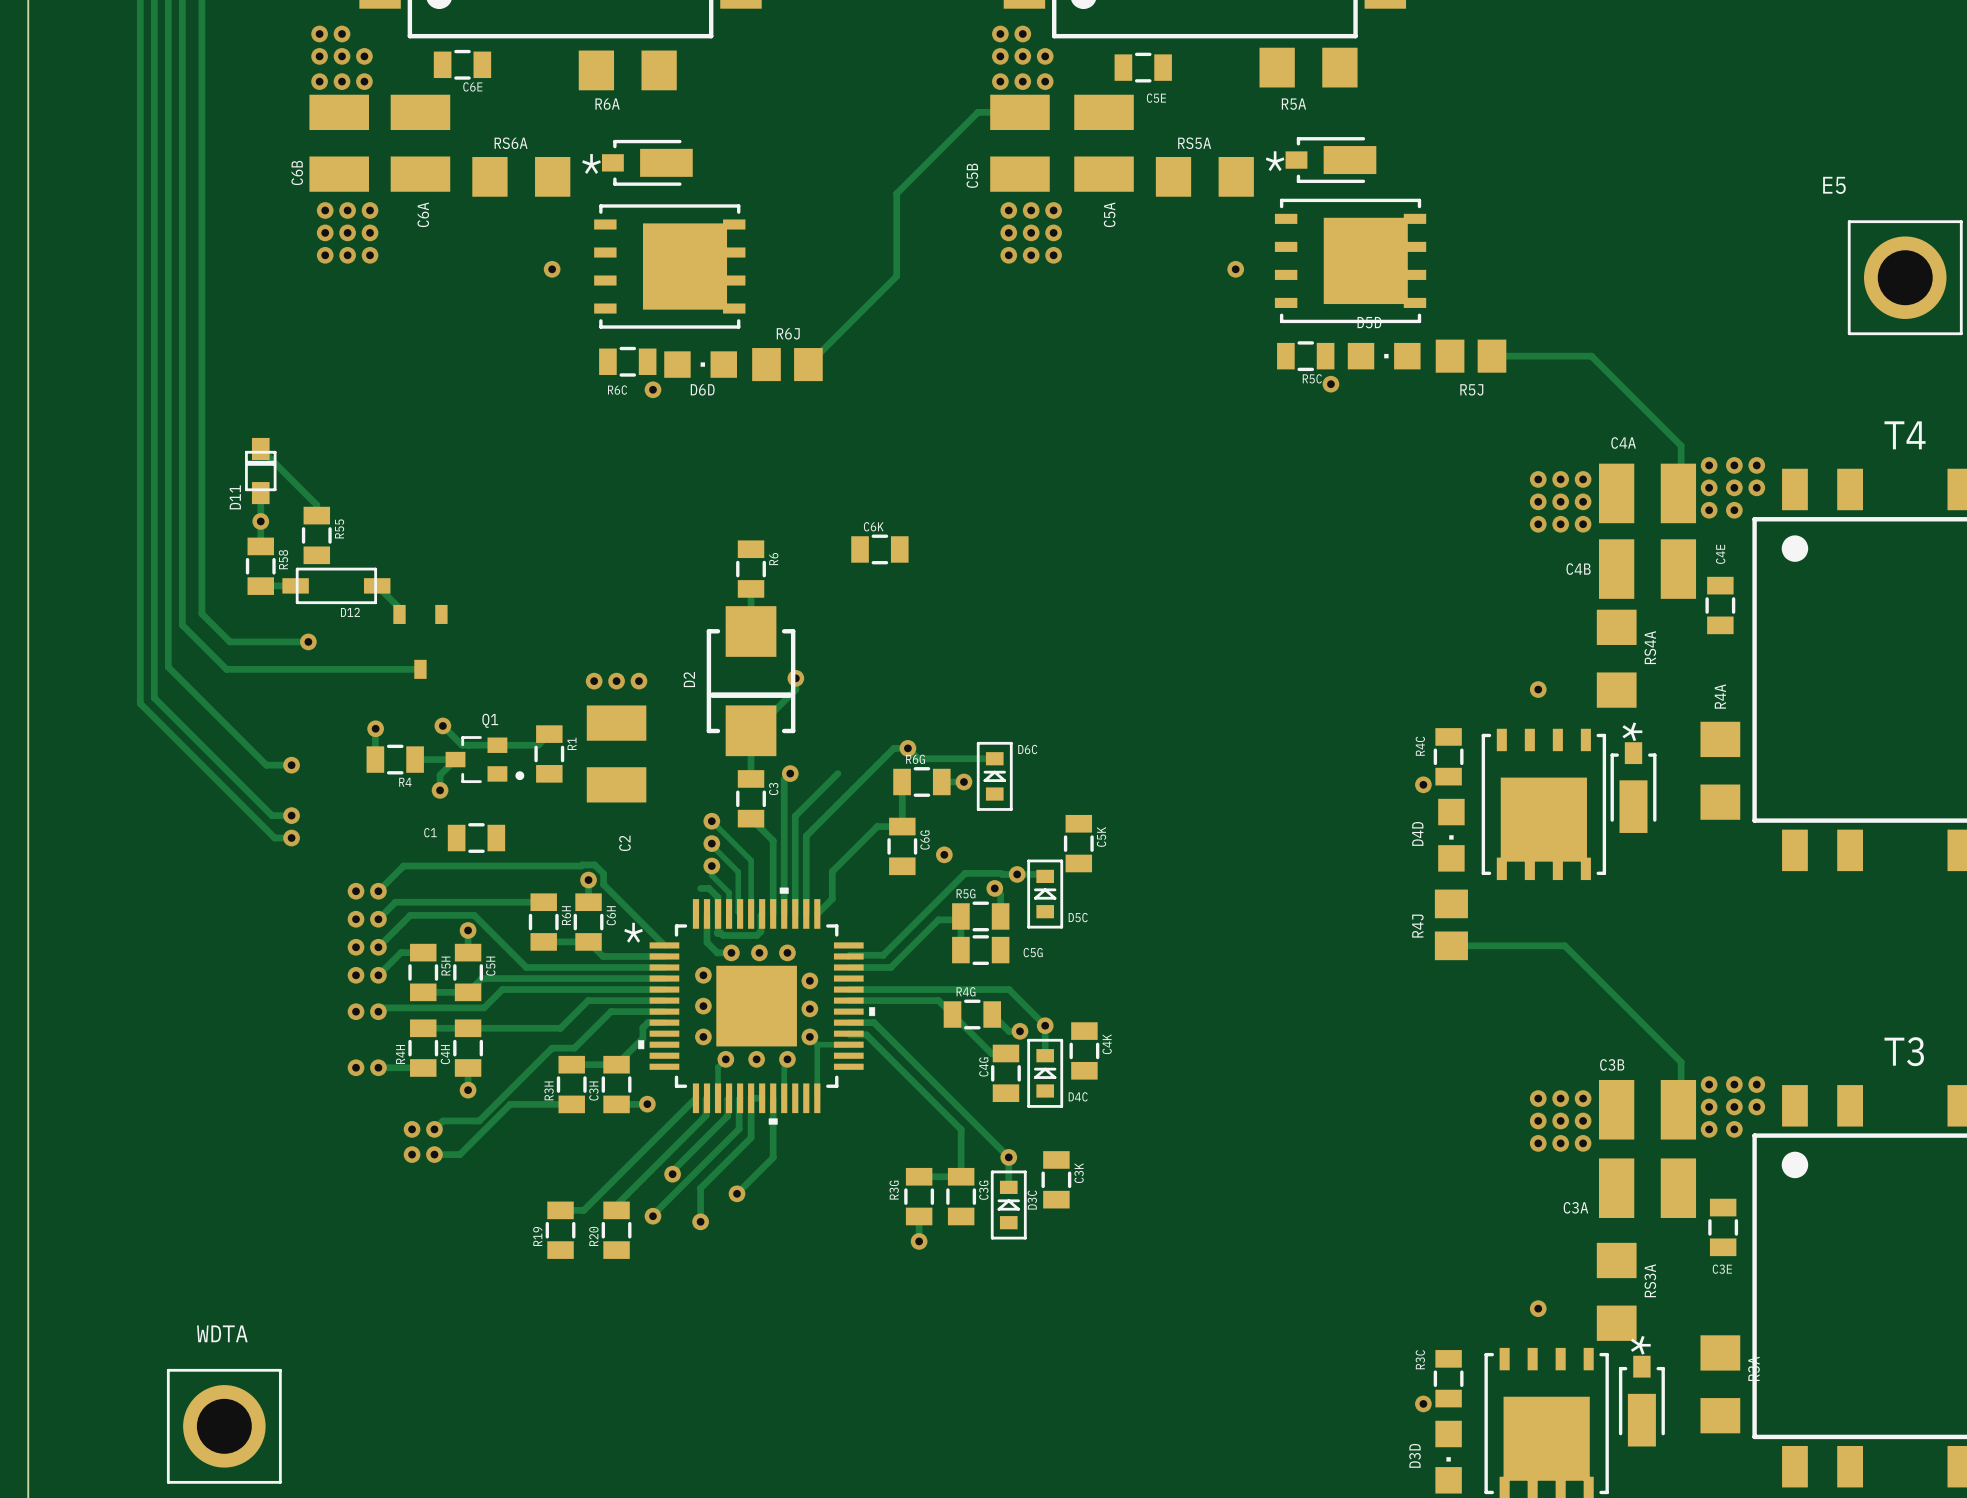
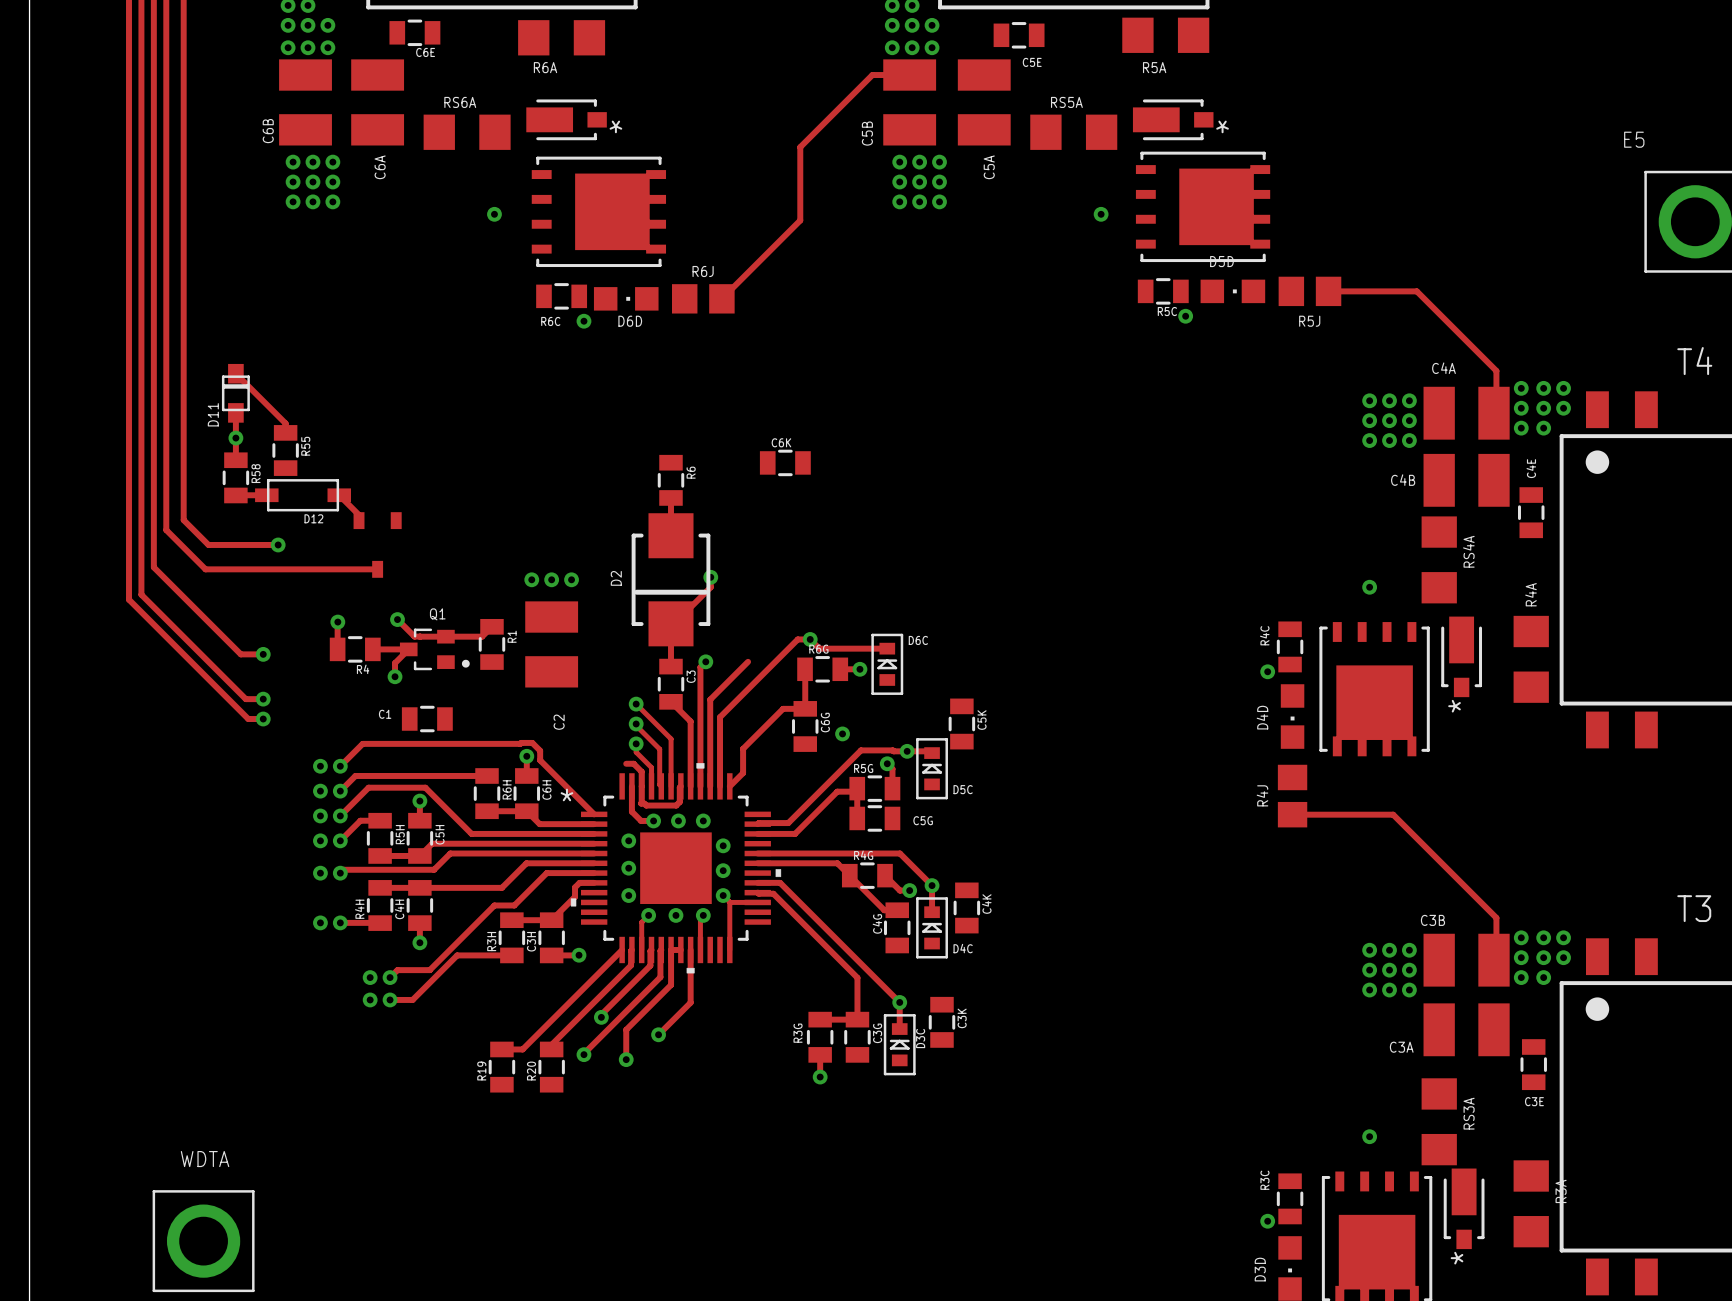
part rotation: 0° (1330, 160) -> 180° (1173, 119)
part rotation: 0° (647, 162) -> 180° (566, 119)
part rotation: 0° (1633, 787) -> 180° (1461, 656)
part rotation: 0° (1641, 1401) -> 180° (1464, 1208)

